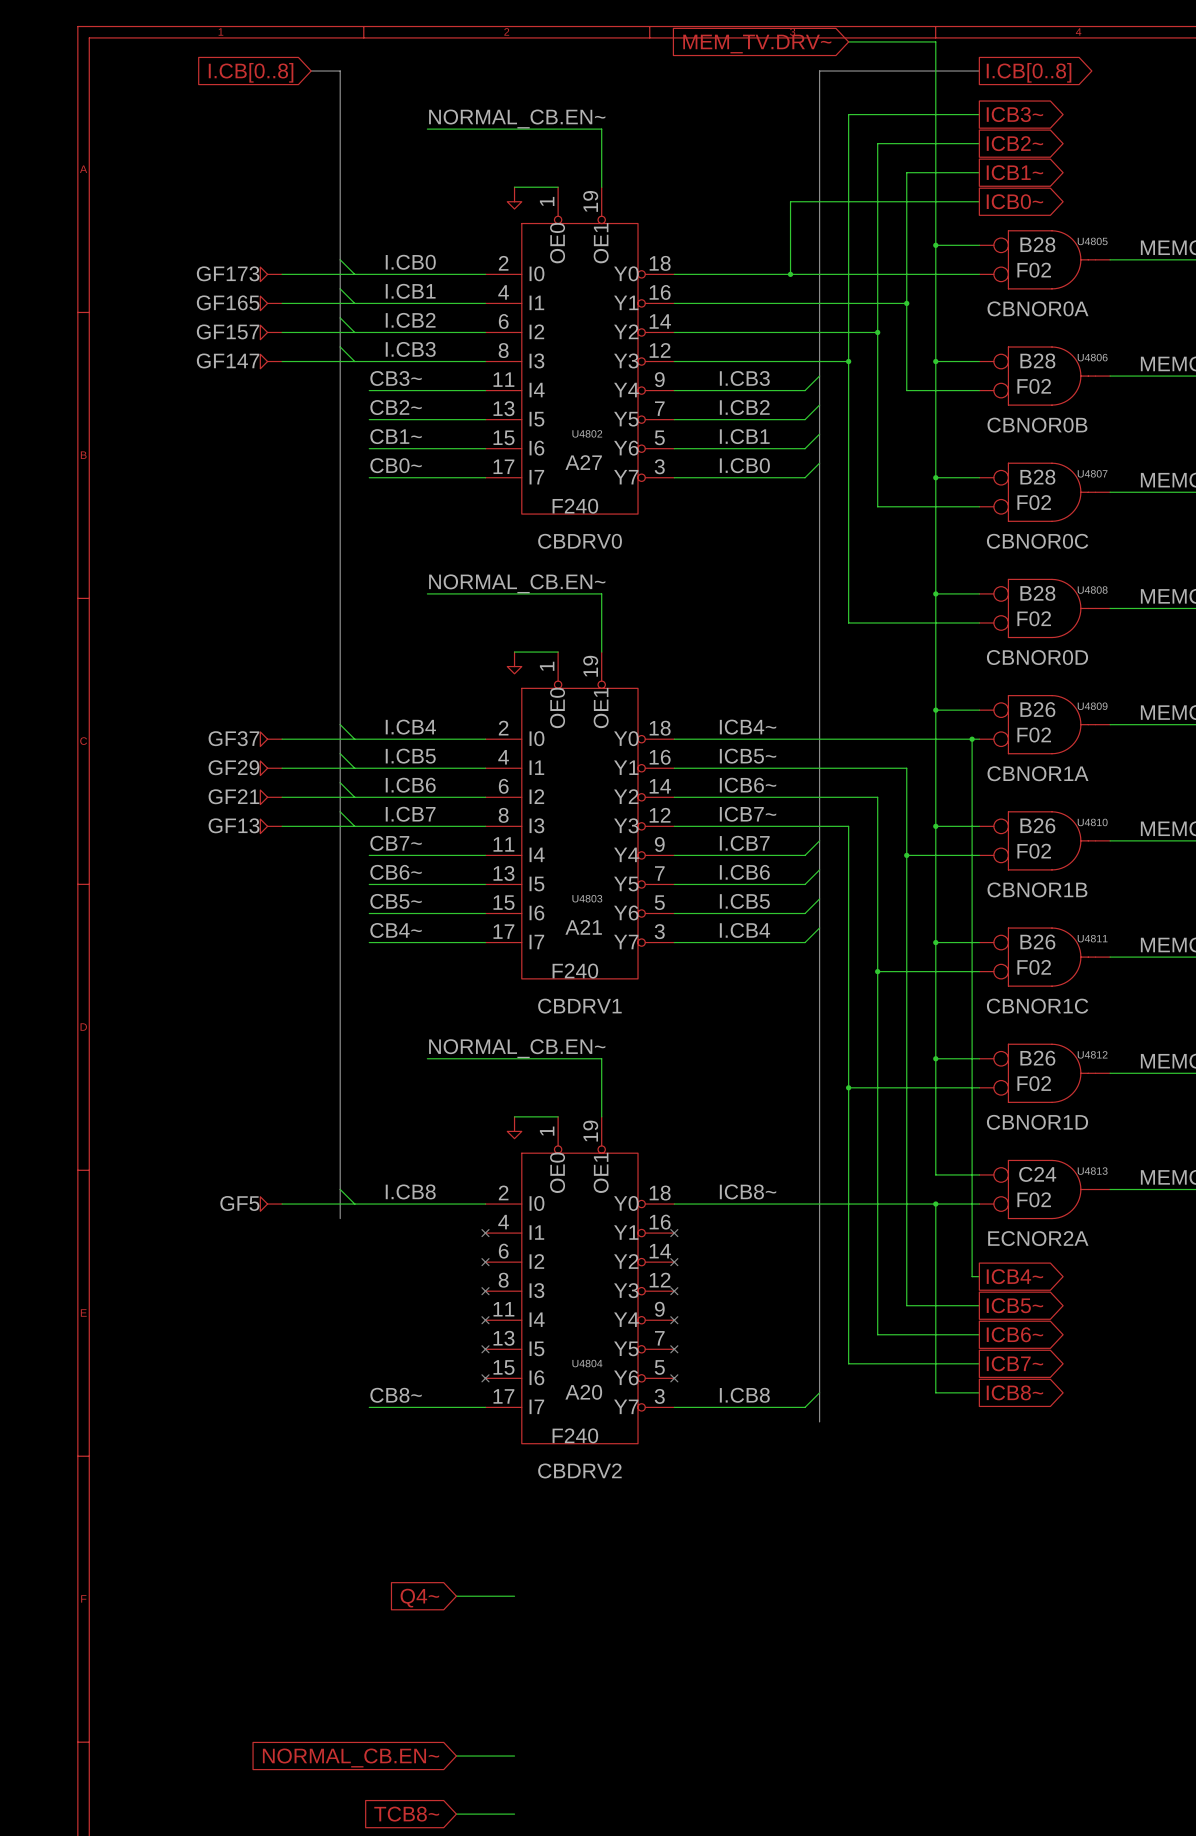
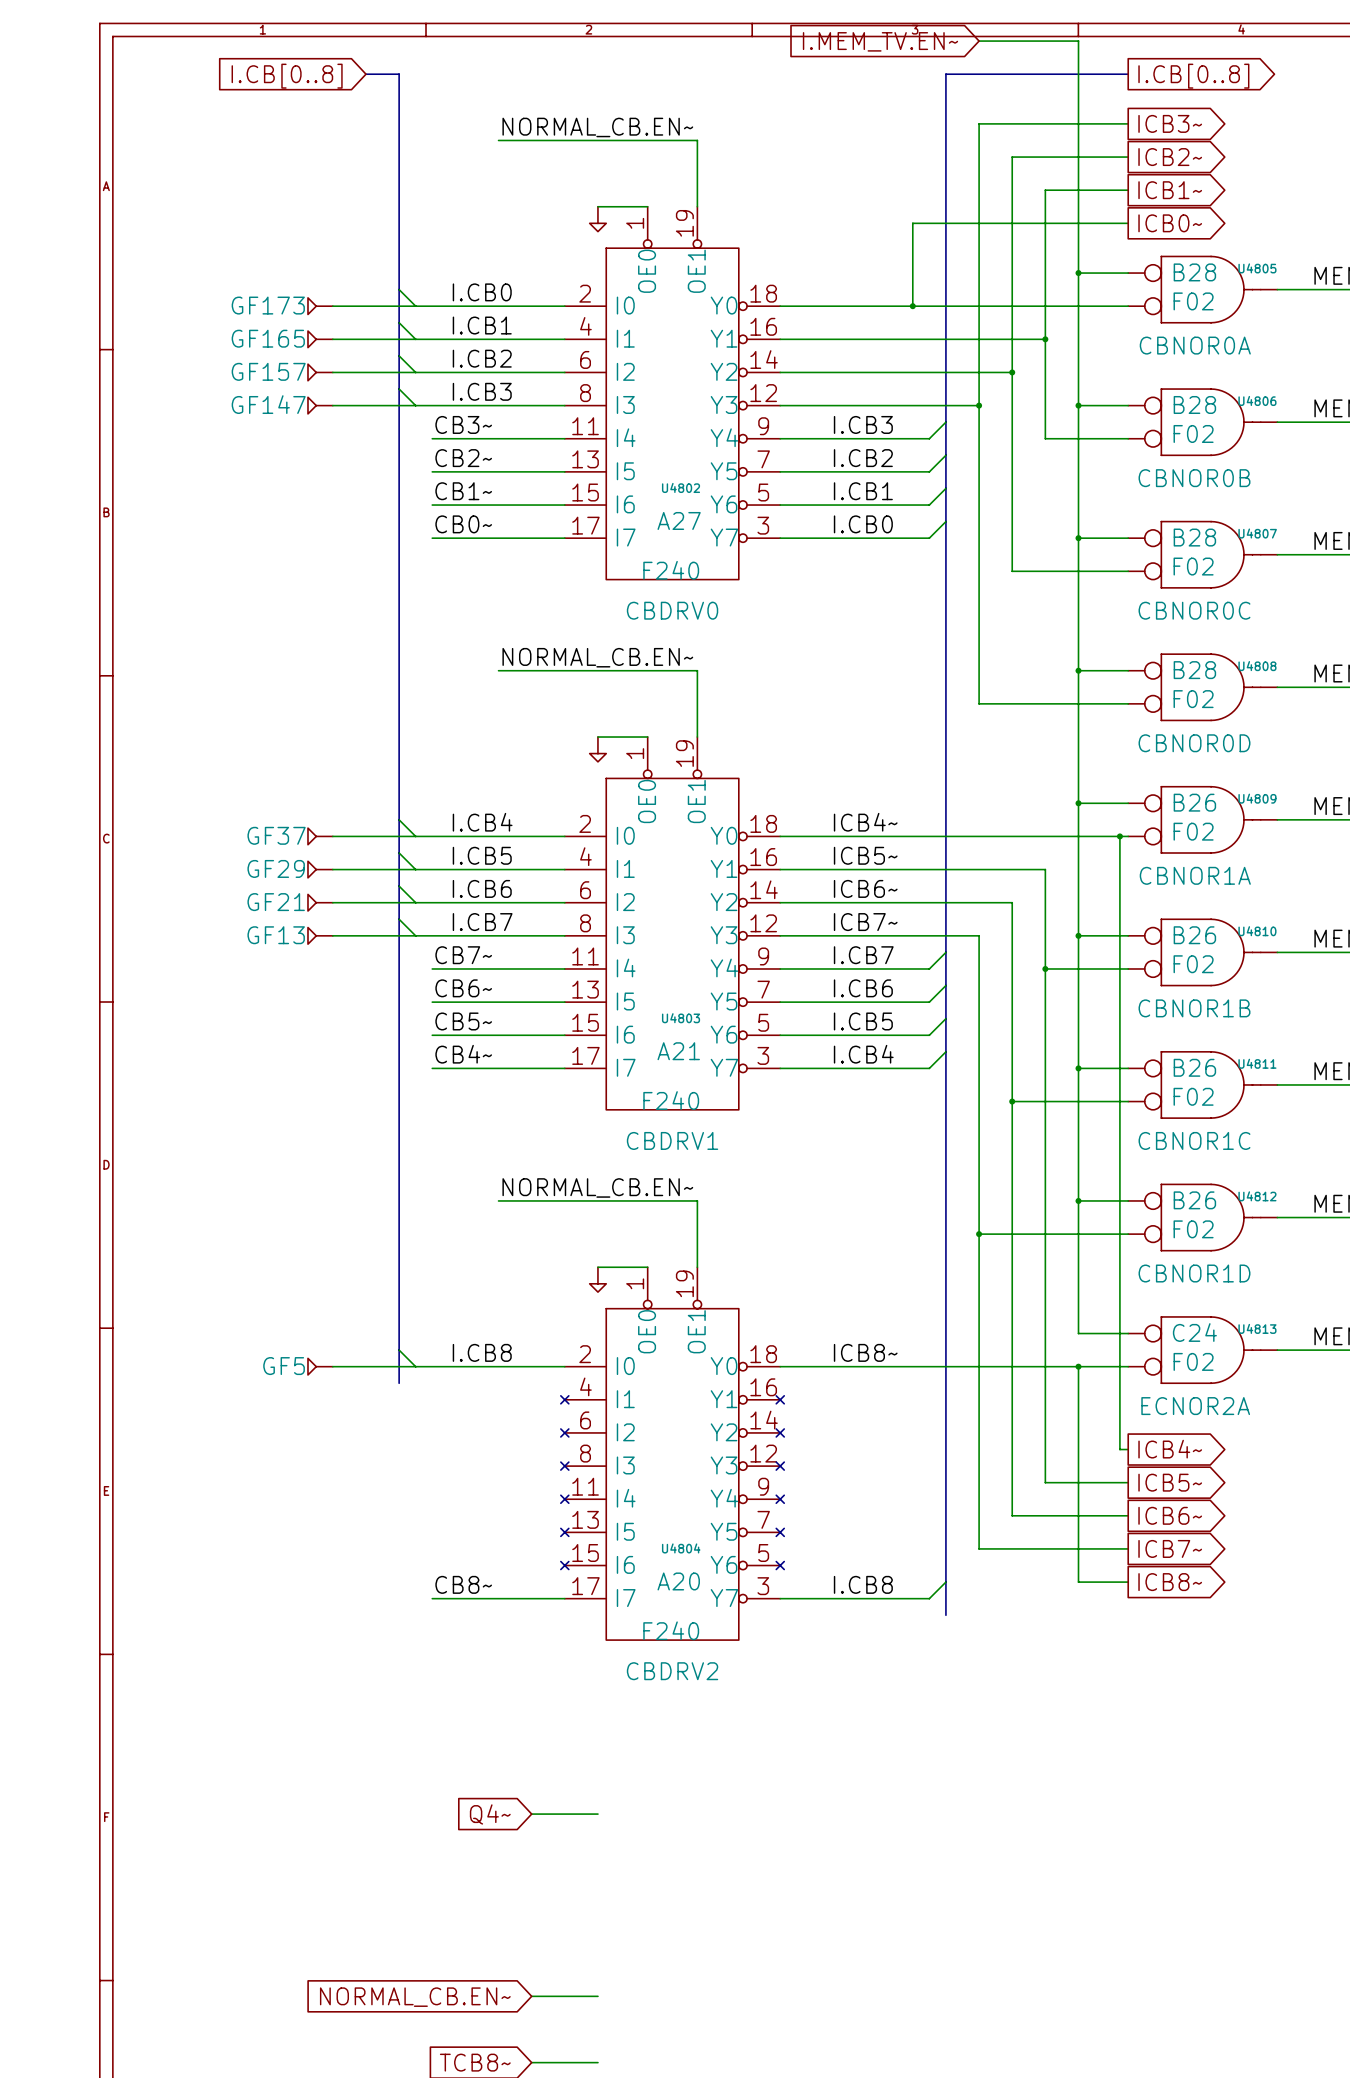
global label: MEM_TV.DRV~ (757, 44) -> I.MEM_TV.EN~ (880, 41)

